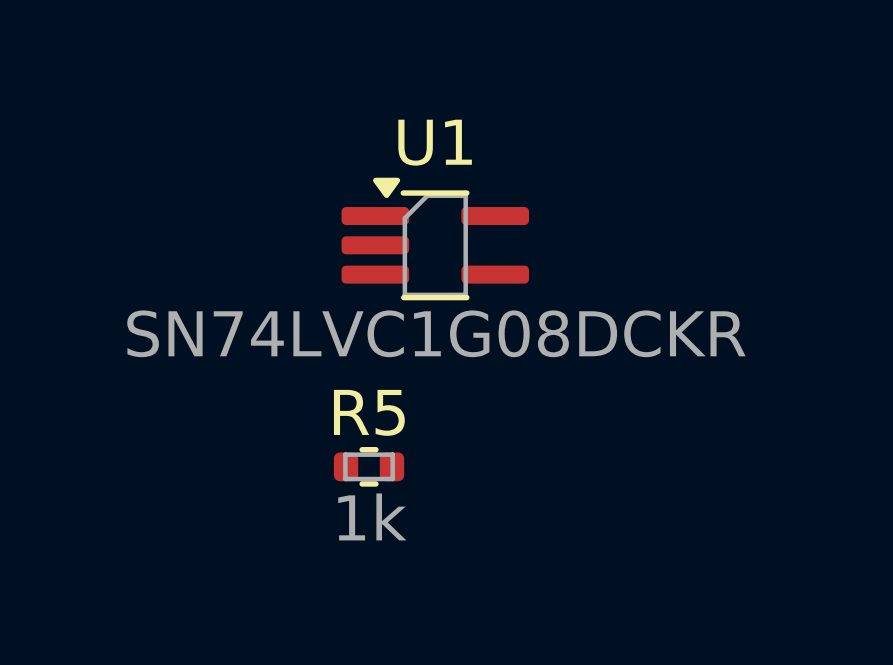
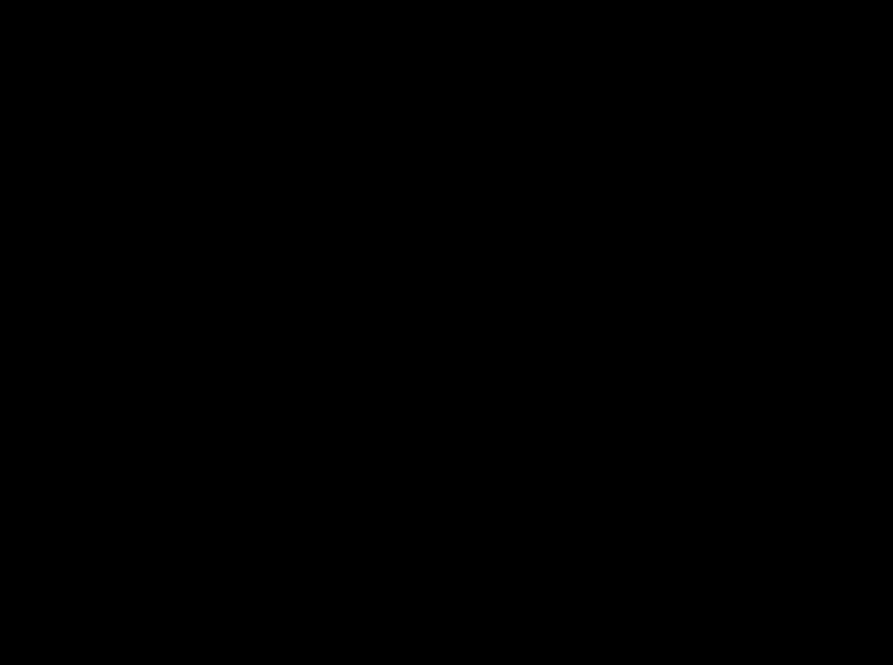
U1: SN74LVC1G08DCKR (435, 239) -> none
R5: 1k (369, 466) -> none

